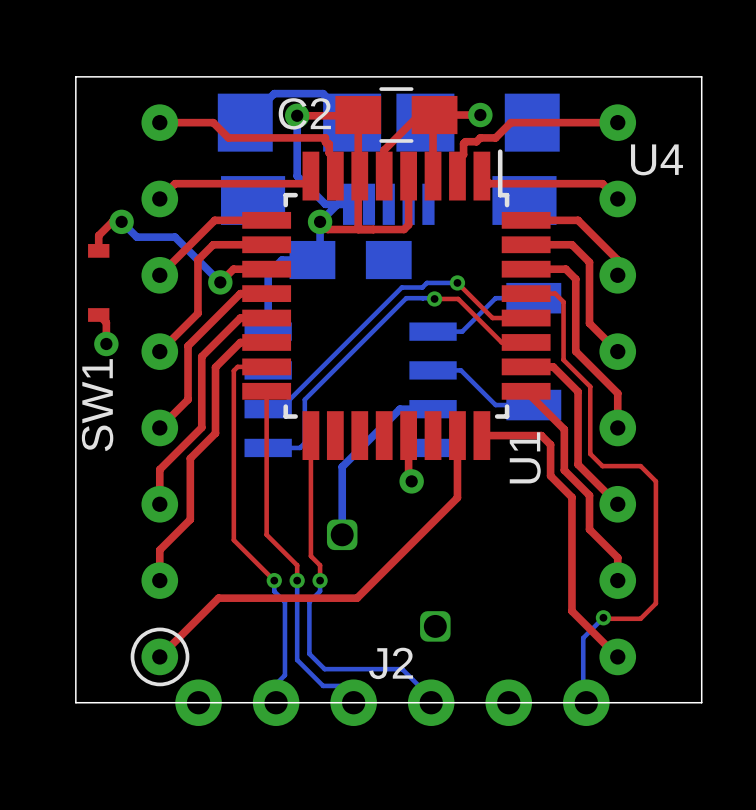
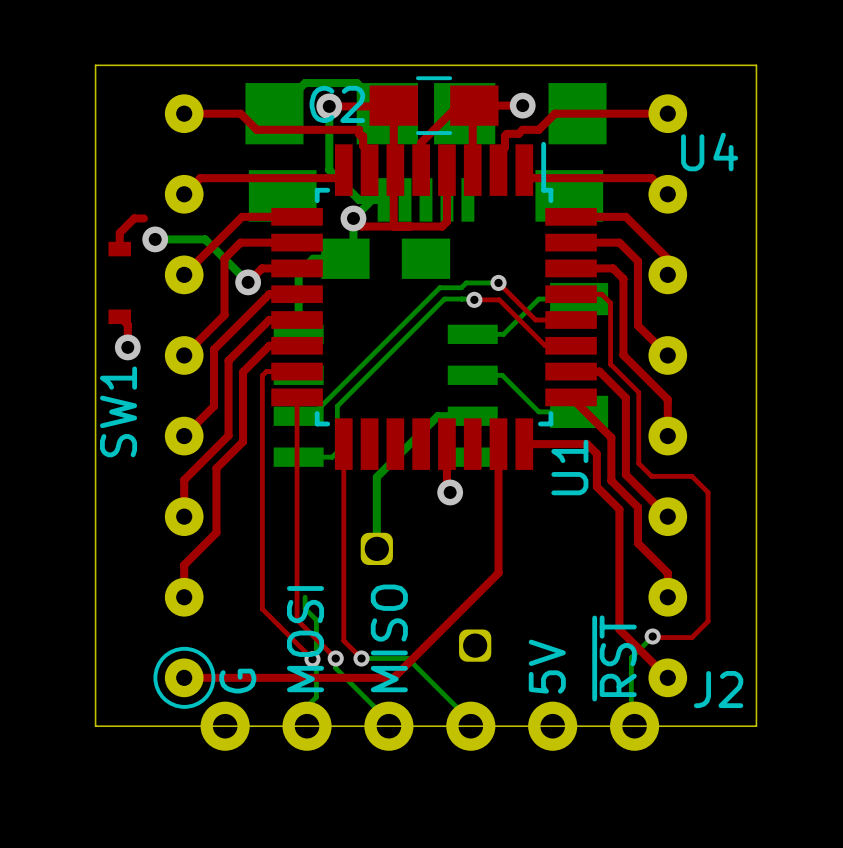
bottom track: (121, 221) (136, 237) (175, 237) (179, 241) -> (155, 239) (205, 239)
via position: (121, 221) -> (155, 239)
top track: (457, 497) (357, 598) (218, 598) (159, 656) -> (498, 509) (498, 573) (393, 677) (184, 677)
top track: (266, 534) (297, 565) (297, 580) -> (297, 548) (297, 619) (335, 658)
top track: (233, 540) (274, 580) -> (262, 554) (262, 609) (312, 659)
top track: (310, 556) (320, 565) (320, 580) -> (343, 571) (343, 640) (361, 658)
via: (274, 580) -> none
bottom track: (297, 580) (297, 659) (323, 685) (341, 685) -> (358, 690) (376, 708)
via: (297, 580) -> none
bottom track: (320, 580) (320, 591) (309, 601) (309, 653) -> (335, 658) (335, 668) (342, 674)
via: (320, 580) -> none
text: none -> MISO (389, 638)
text: none -> MOSI (305, 639)
text: none -> ~{RST} (614, 658)
via: none -> (335, 658)
via: none -> (361, 658)
via: none -> (312, 659)
text: none -> 5V (547, 666)
text: none -> G (237, 681)
J2 name position: J2 (391, 663) -> J2 (718, 689)
bottom track: (324, 669) (402, 669) -> (361, 658) (407, 658) (440, 690)

